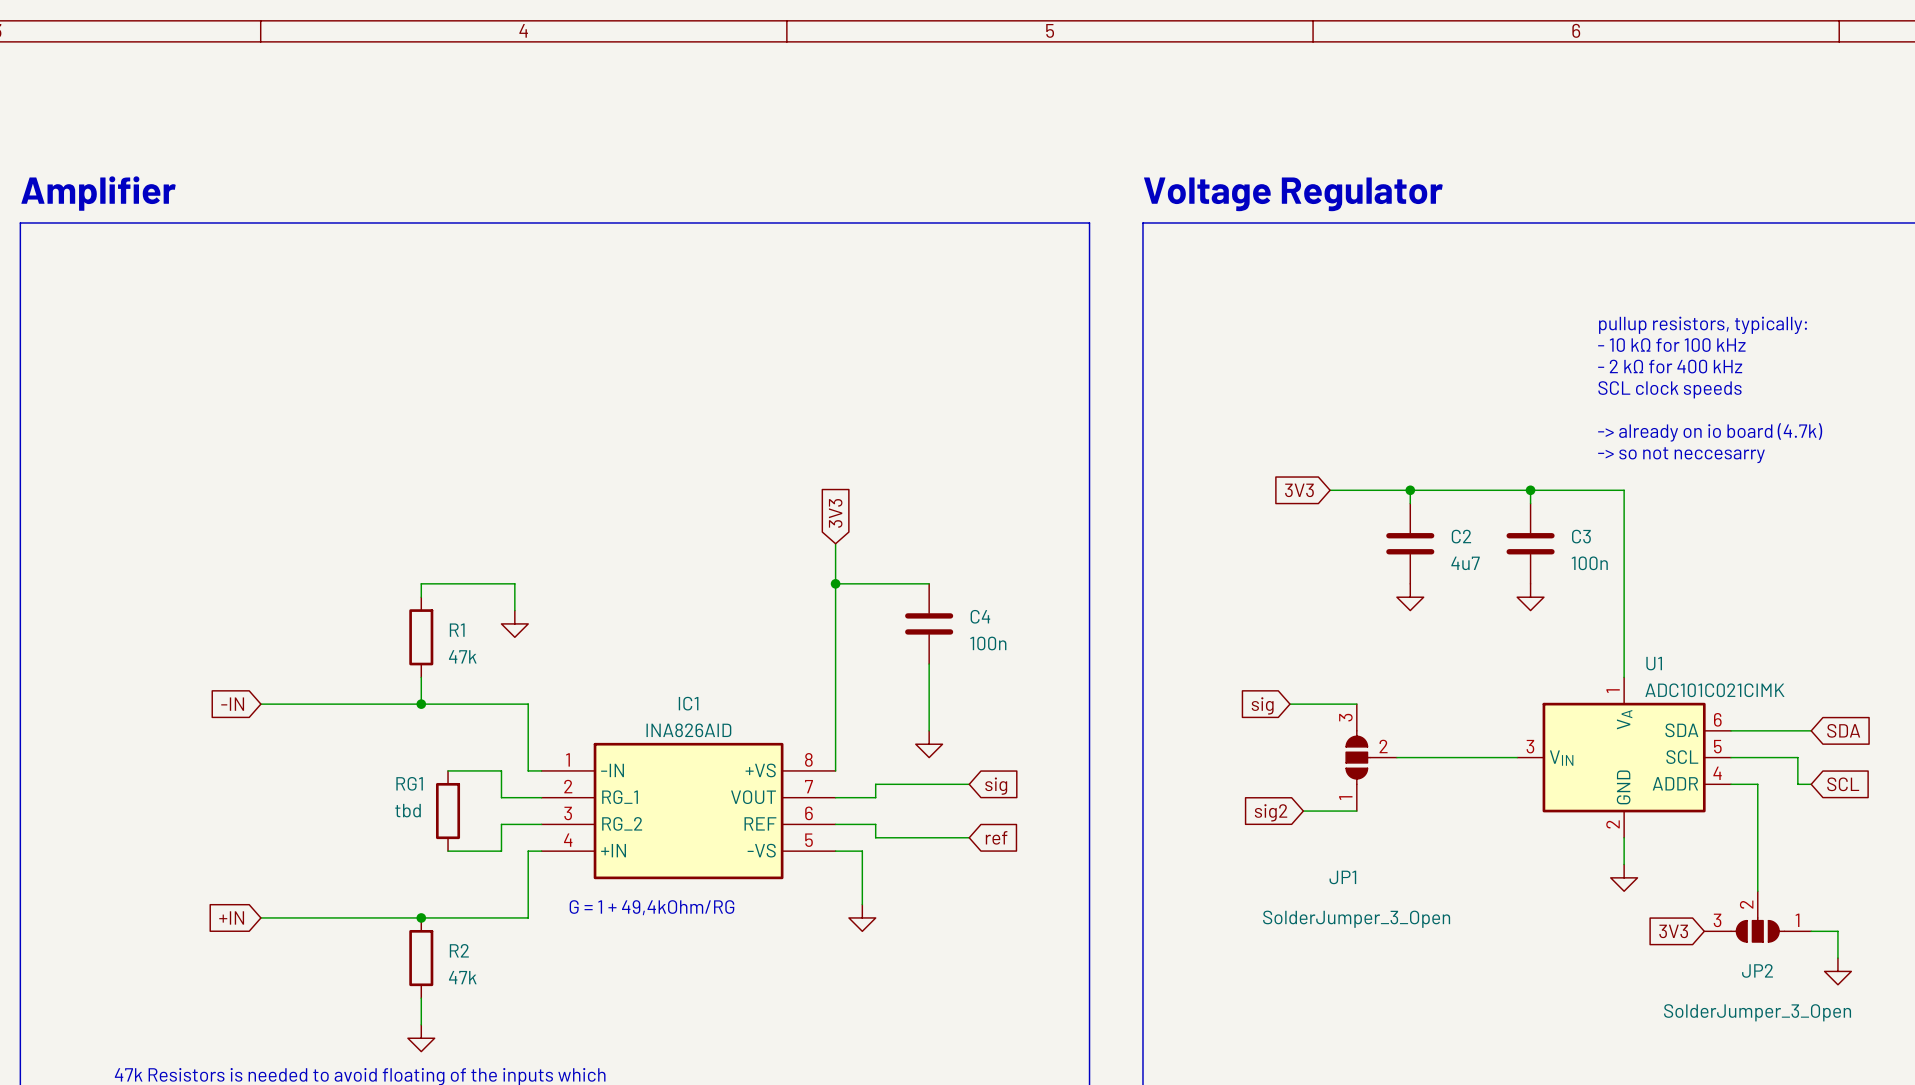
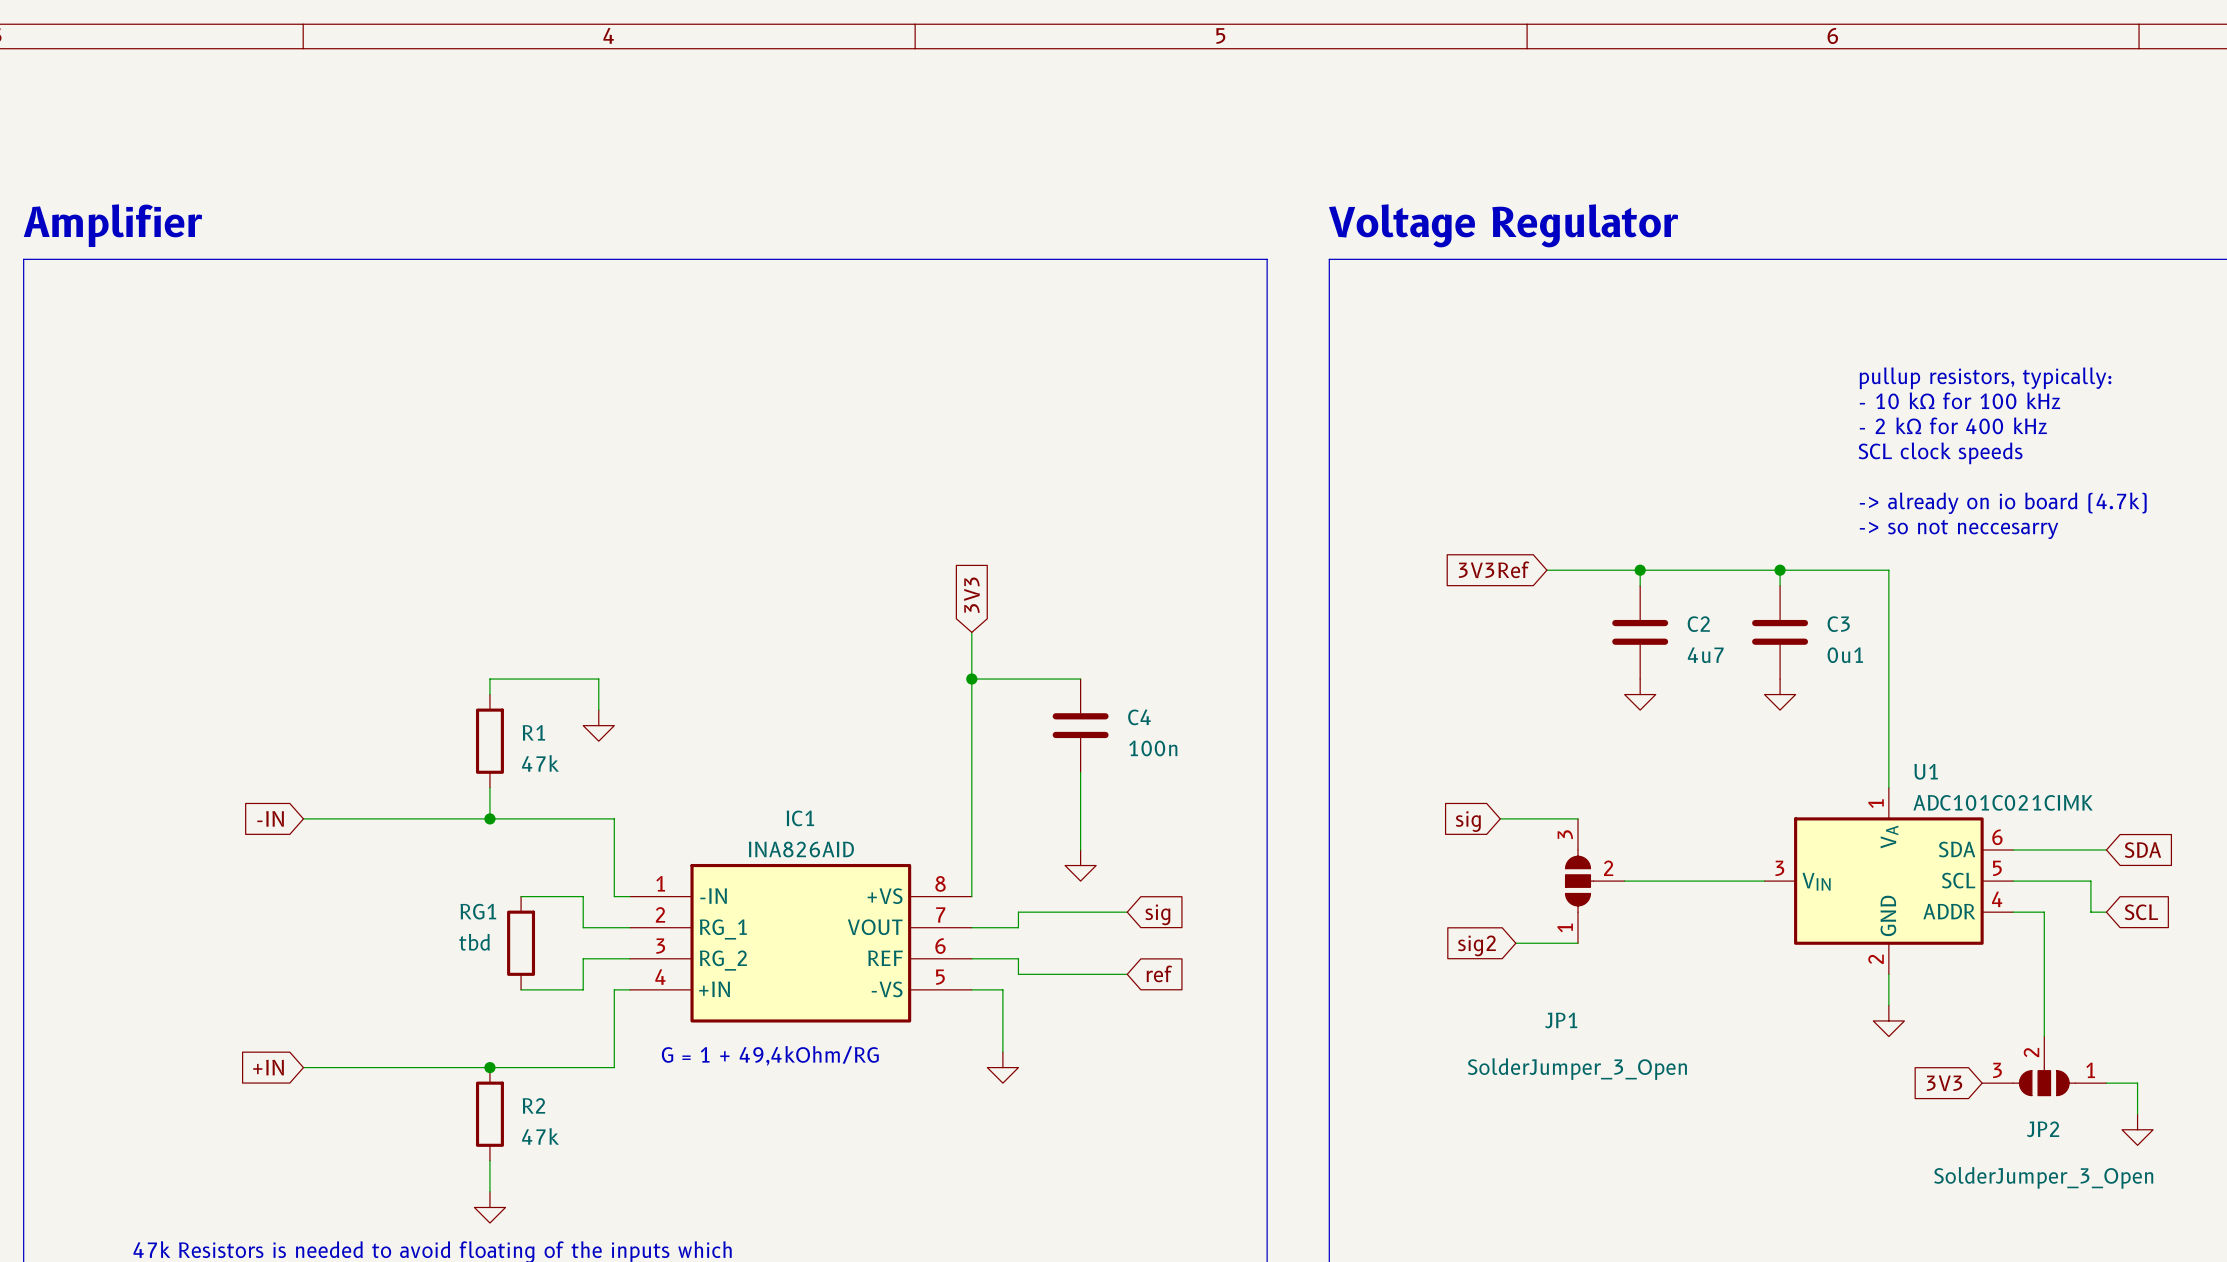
global label: 3V3 (1299, 490) -> 3V3Ref (1494, 569)
C3 value: 100n (1589, 563) -> 0u1 (1845, 655)

